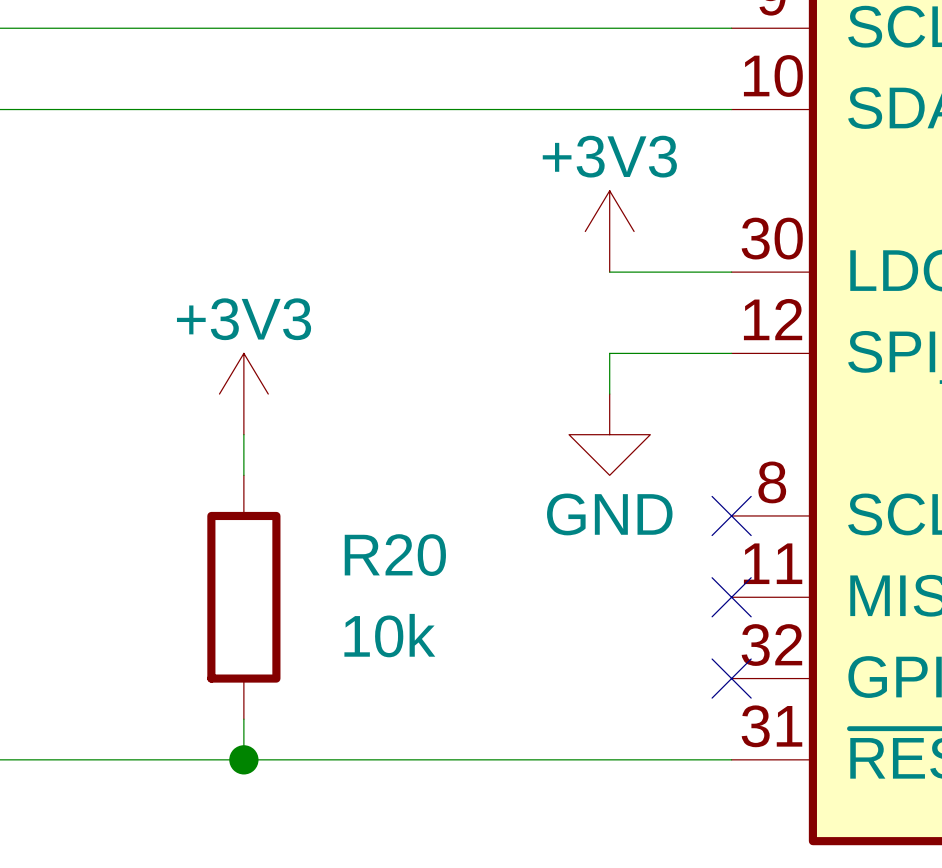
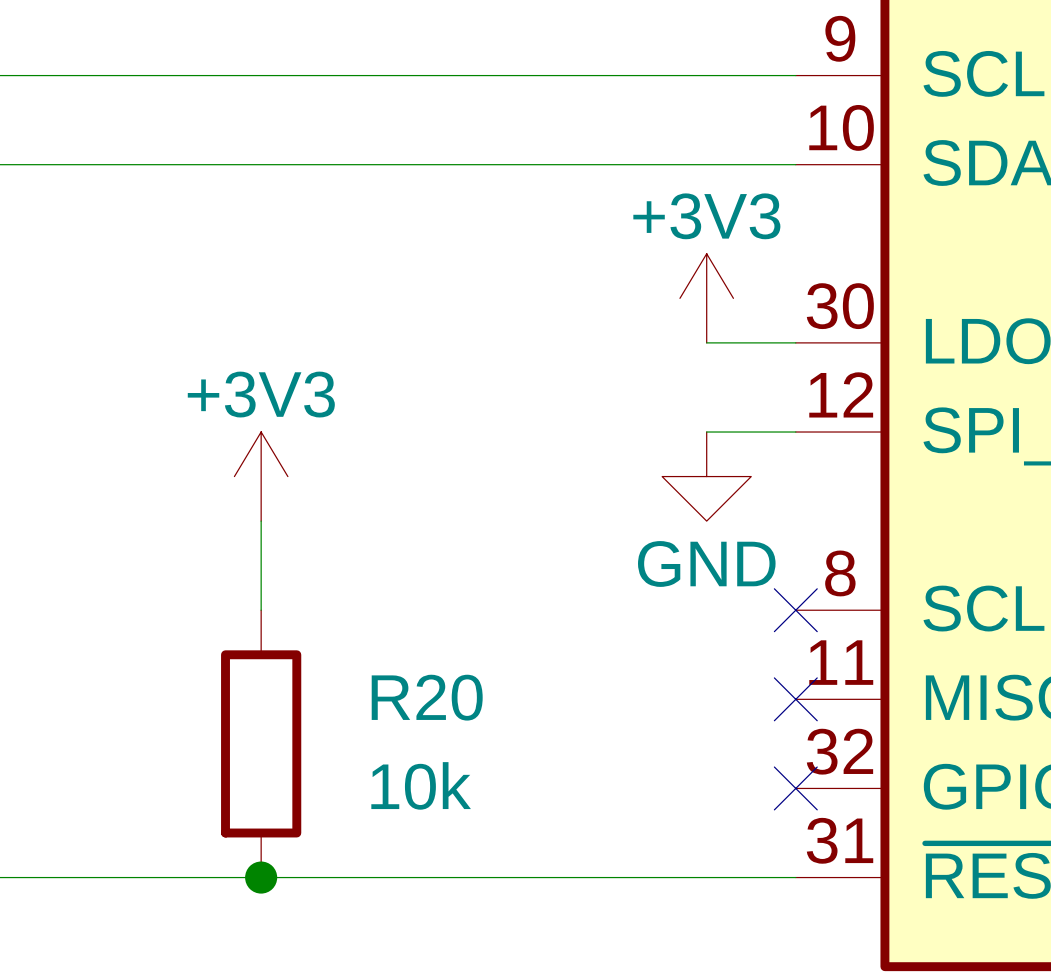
power symbol position: +3V3 (609, 231) -> +3V3 (706, 298)
wire: (609, 272) (650, 272) -> none
wire: (650, 353) (609, 353) (609, 394) -> none
power symbol position: GND (609, 434) -> GND (706, 476)
R20 position: (243, 597) -> (261, 743)

